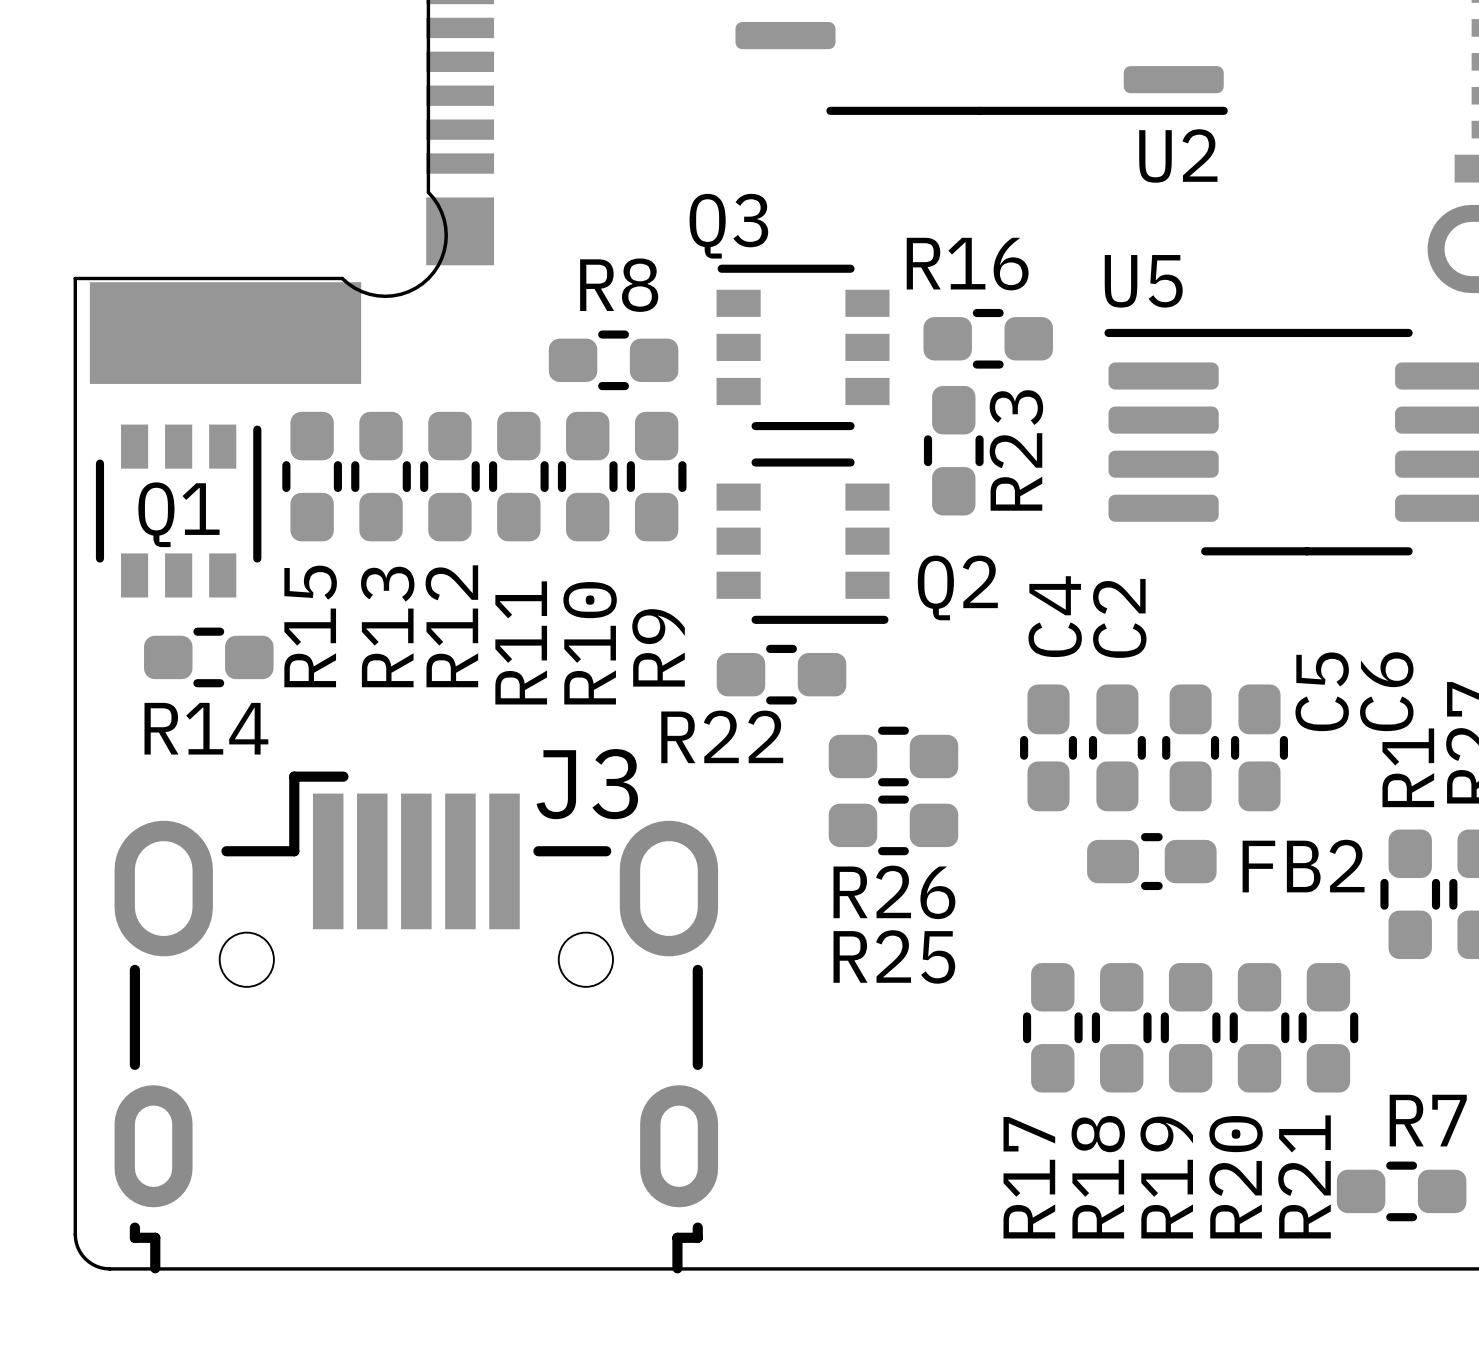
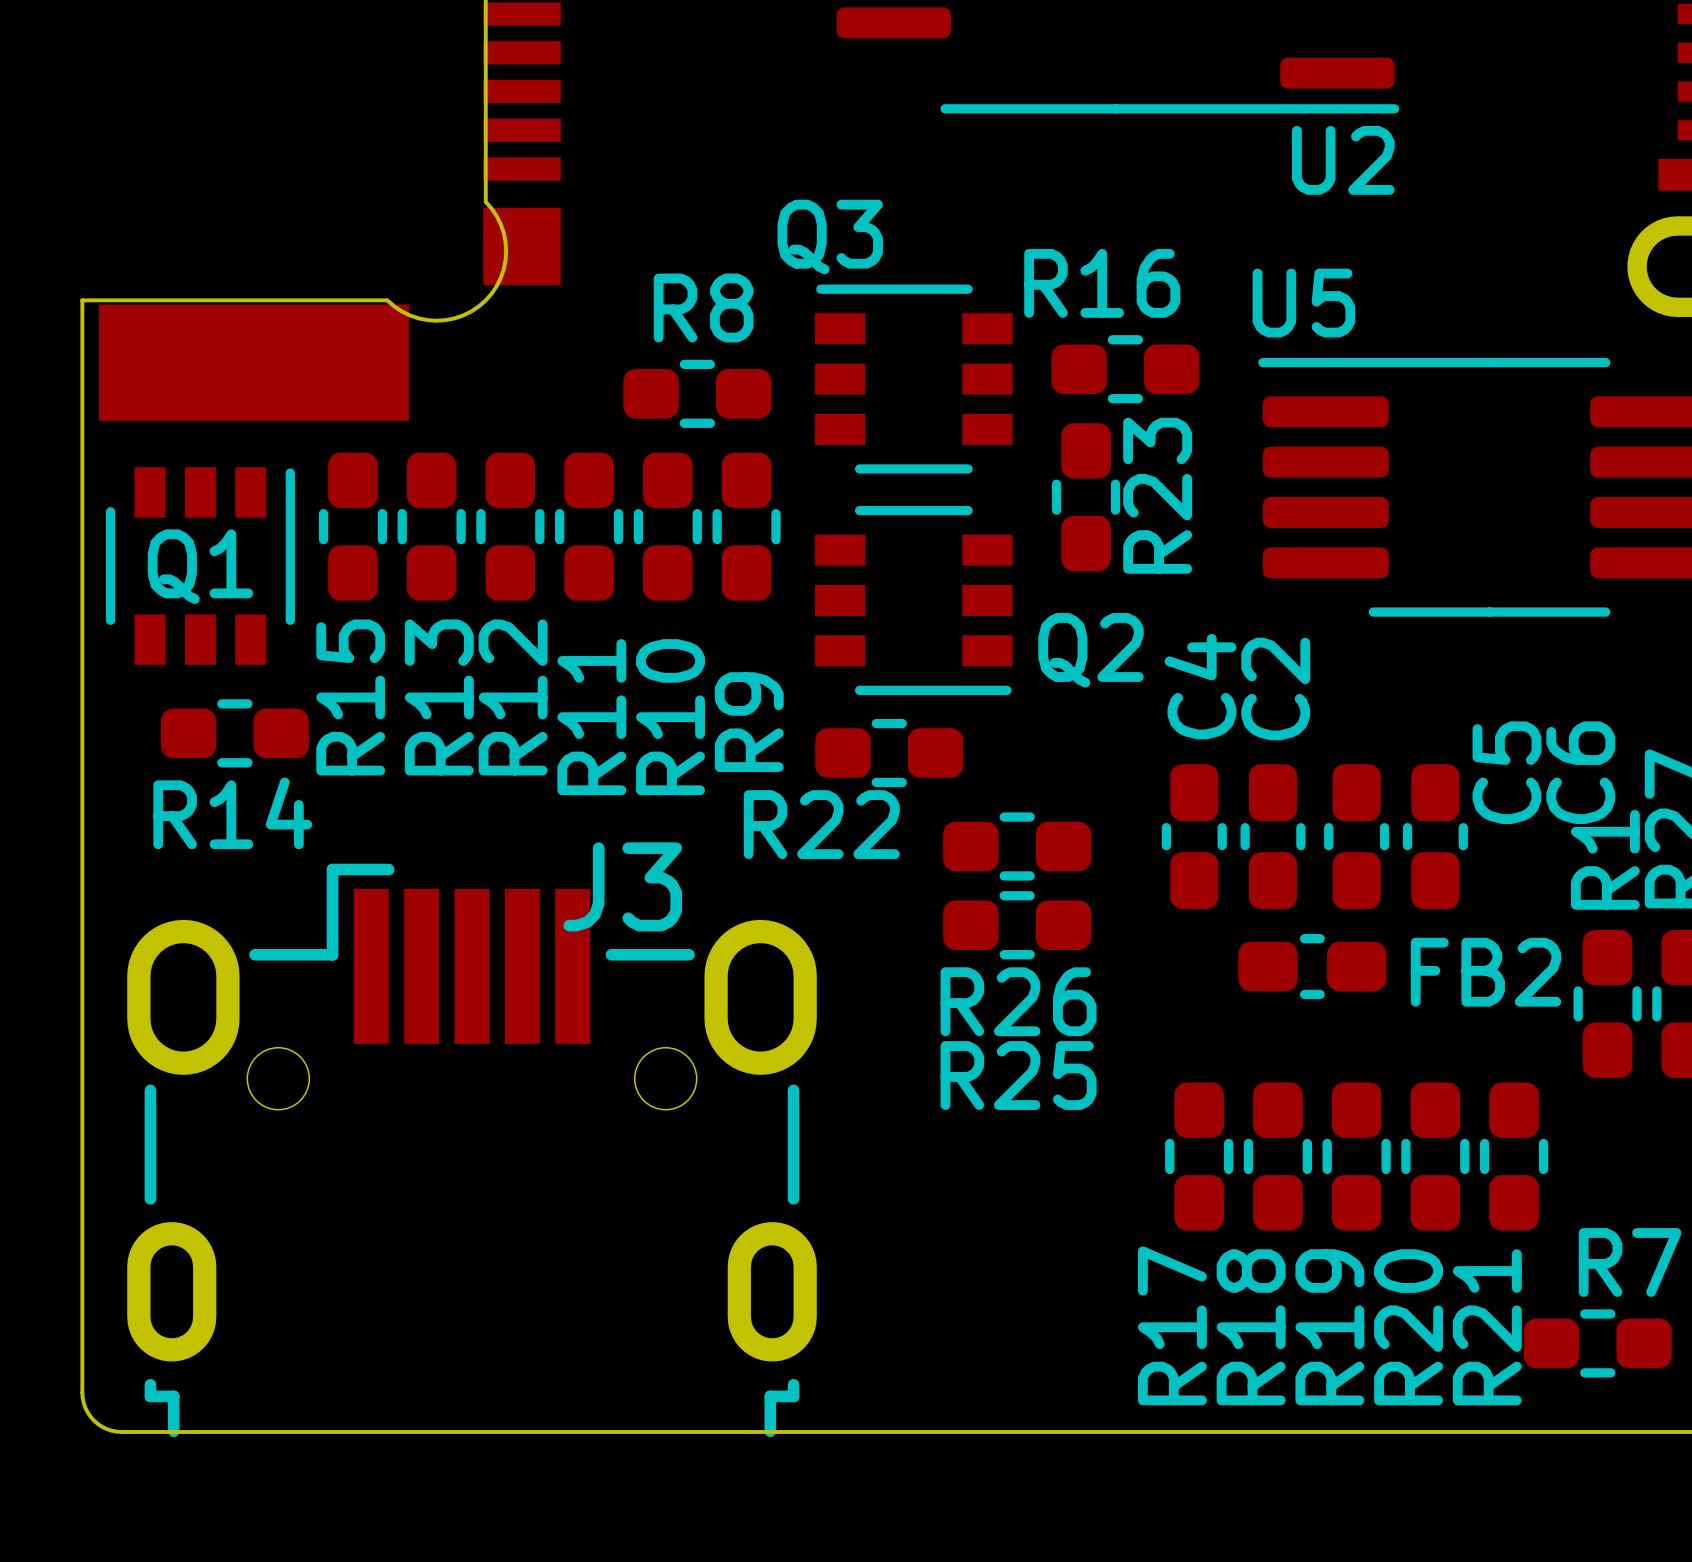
J3 name position: J3 (587, 784) -> J3 (622, 886)

